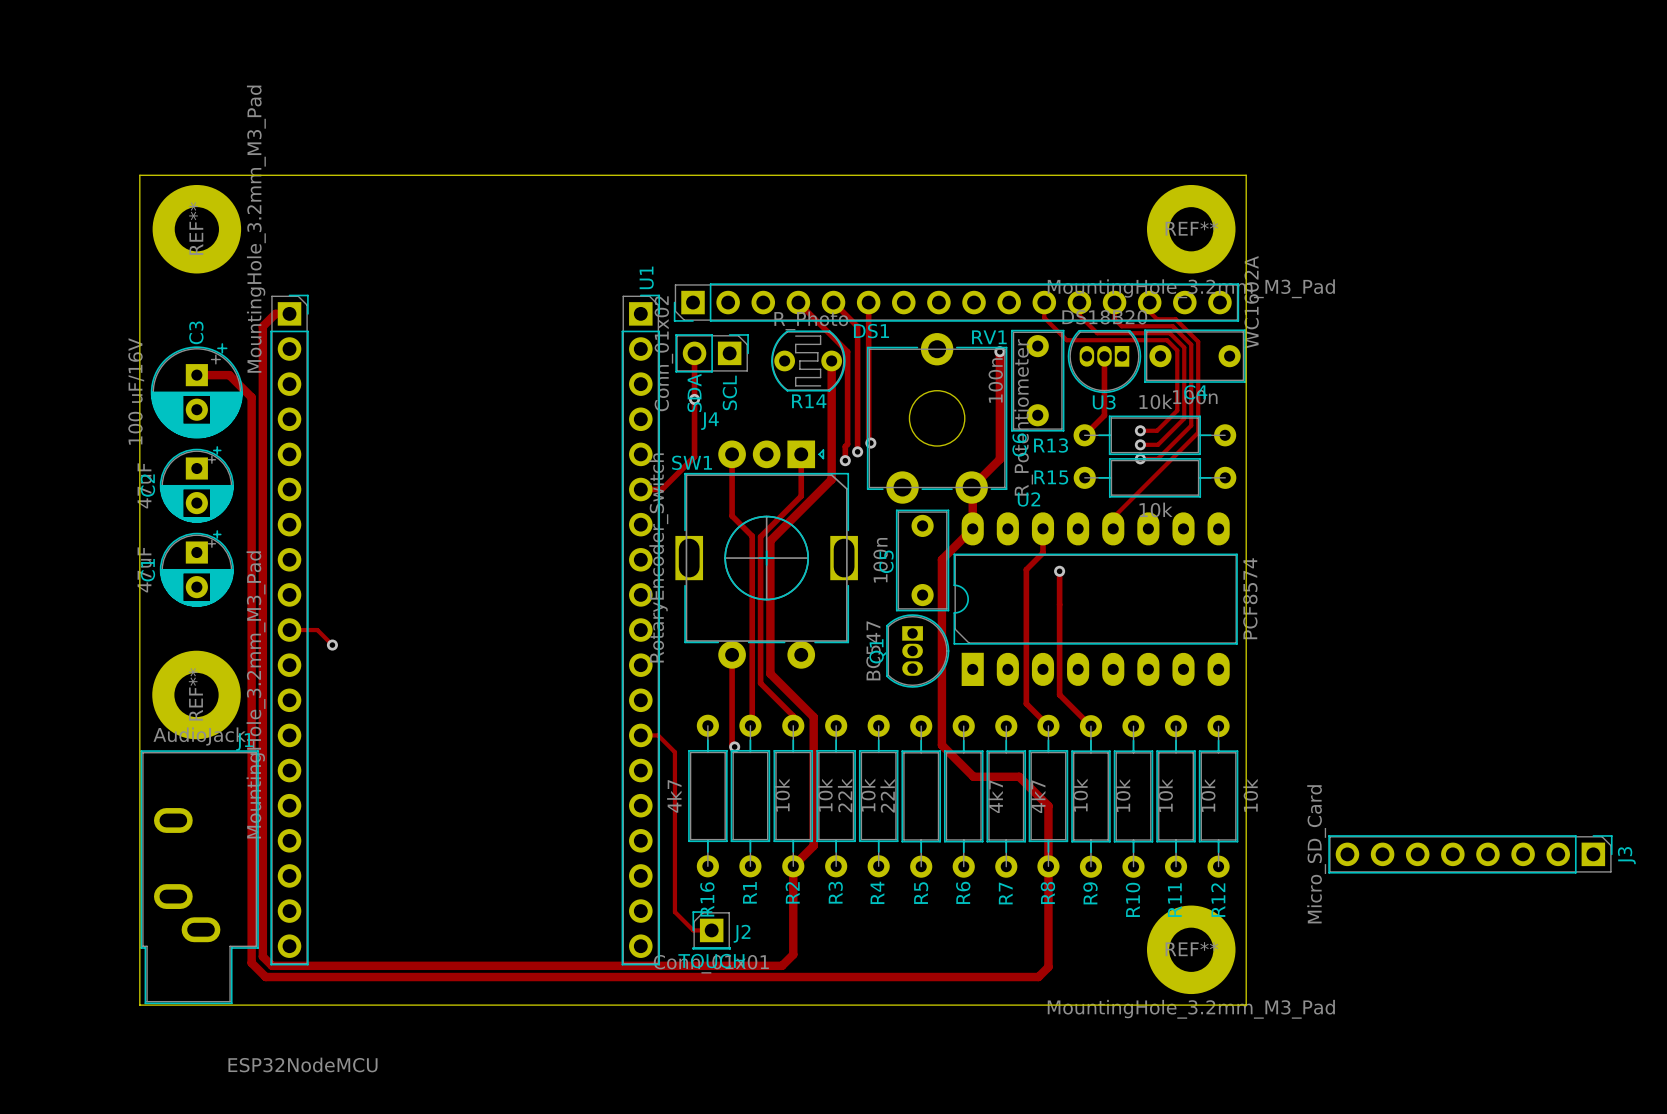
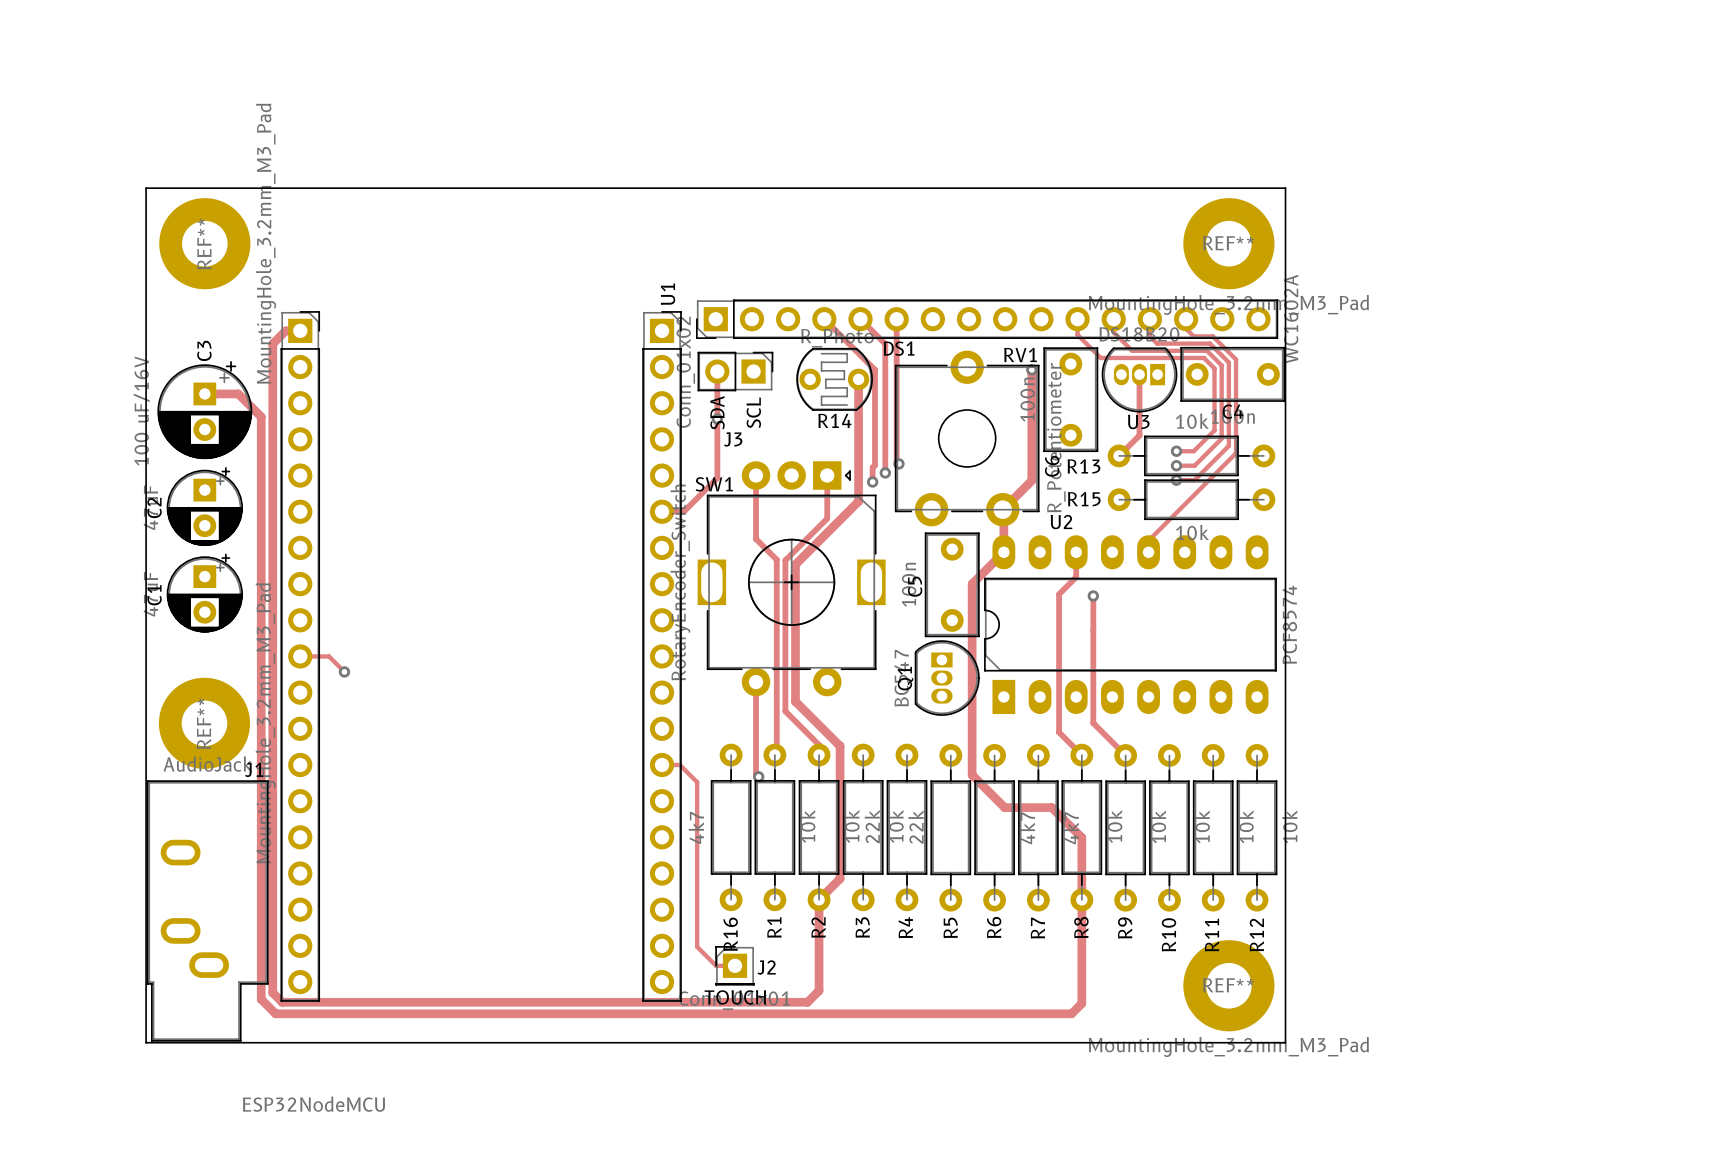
J4 name: J4 (709, 421) -> J3 (733, 439)
J3: Micro_SD_Card (1470, 854) -> none

